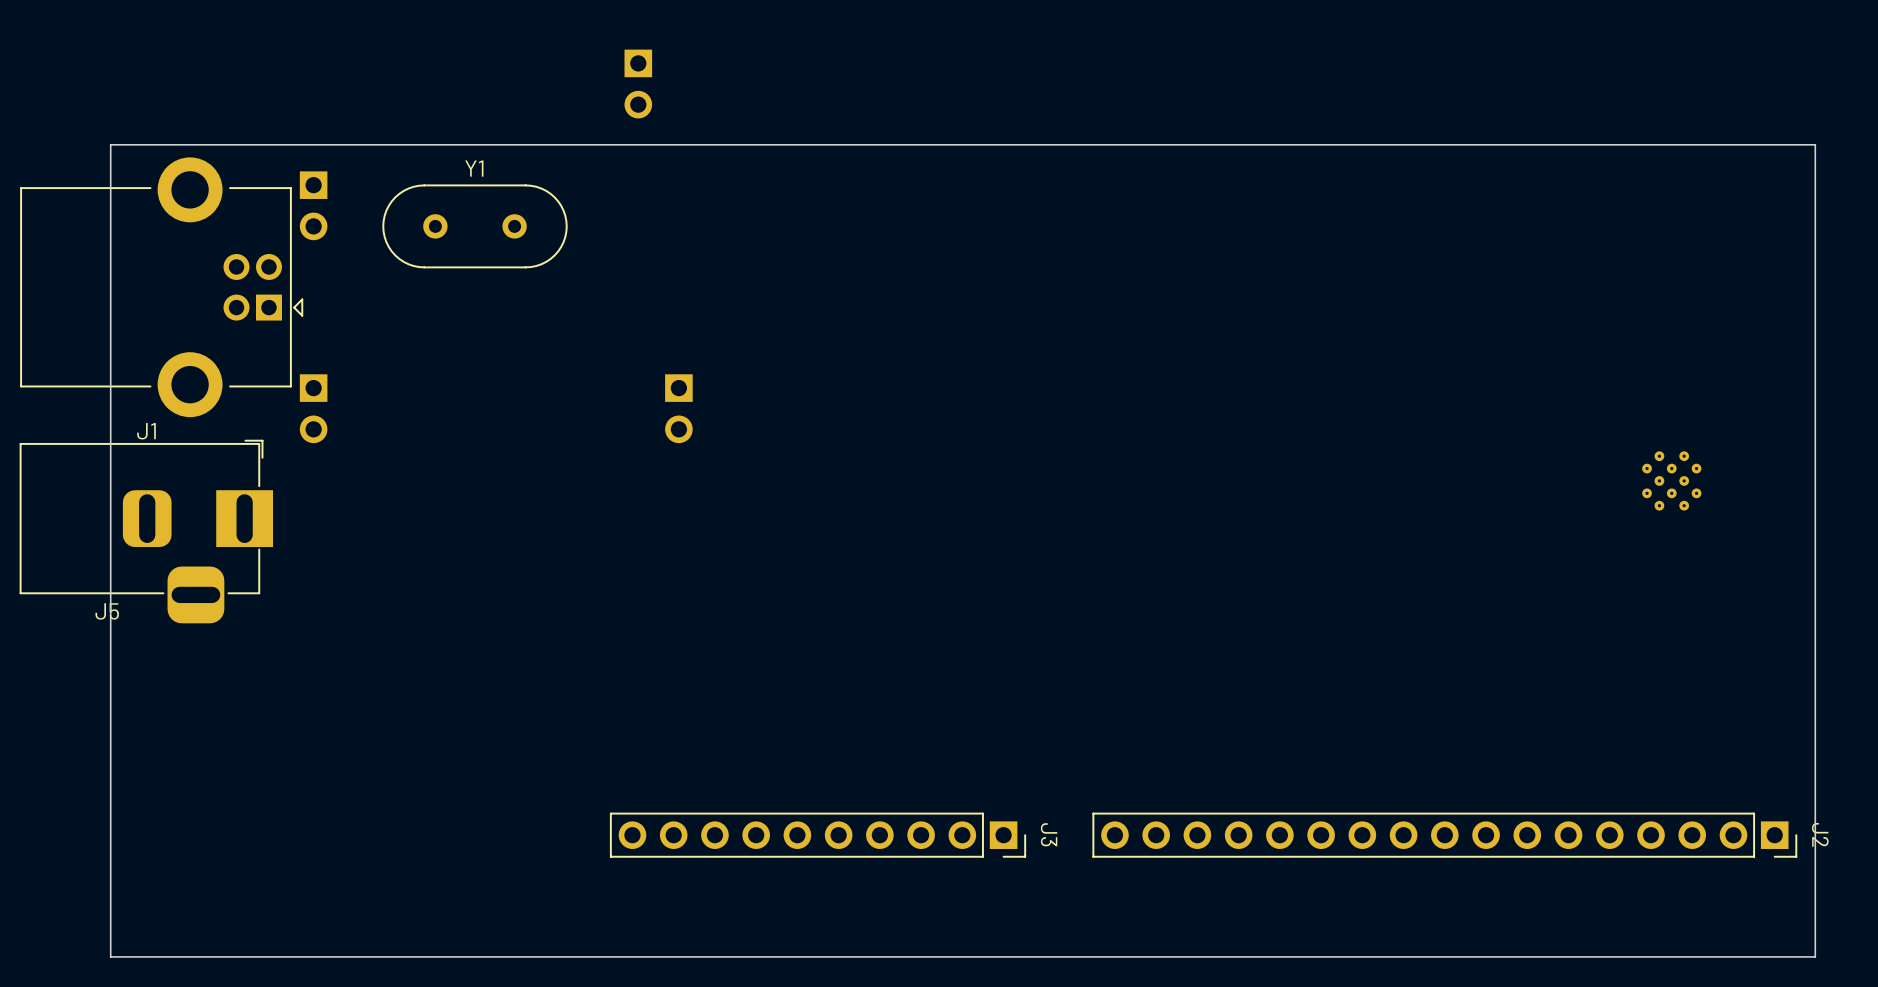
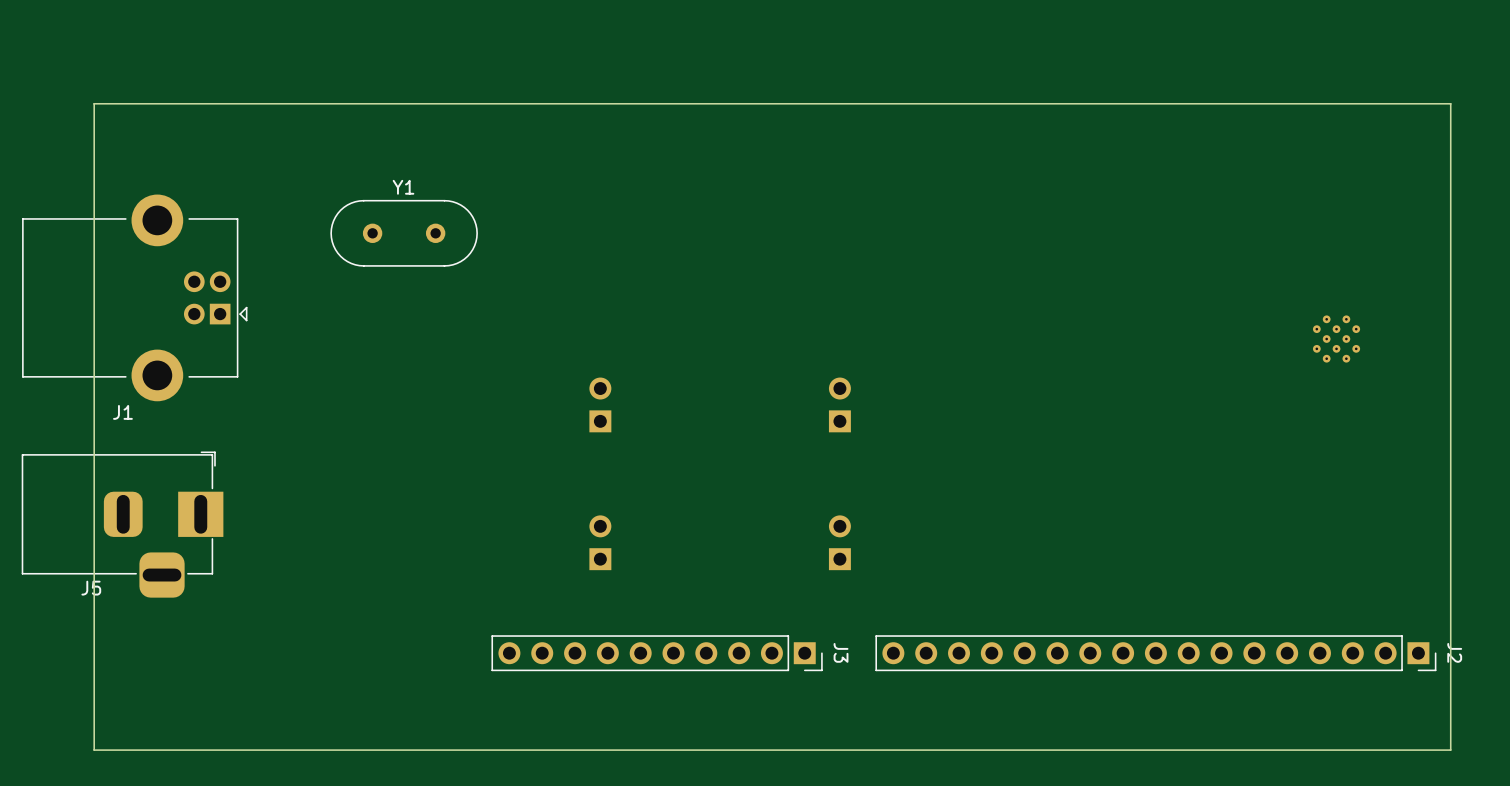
part: (638, 84) -> none
part: (313, 205) -> none
Y1 position: (474, 226) -> (404, 233)
J1 position: (161, 287) -> (134, 297)
part: (313, 408) -> none
part rotation: 0° (678, 408) -> 180° (600, 404)
part position: (678, 408) -> (600, 404)
part position: (1671, 480) -> (1336, 338)
part: none -> (839, 404)
J5 position: (146, 531) -> (122, 524)
part: none -> (600, 542)
part: none -> (839, 542)

